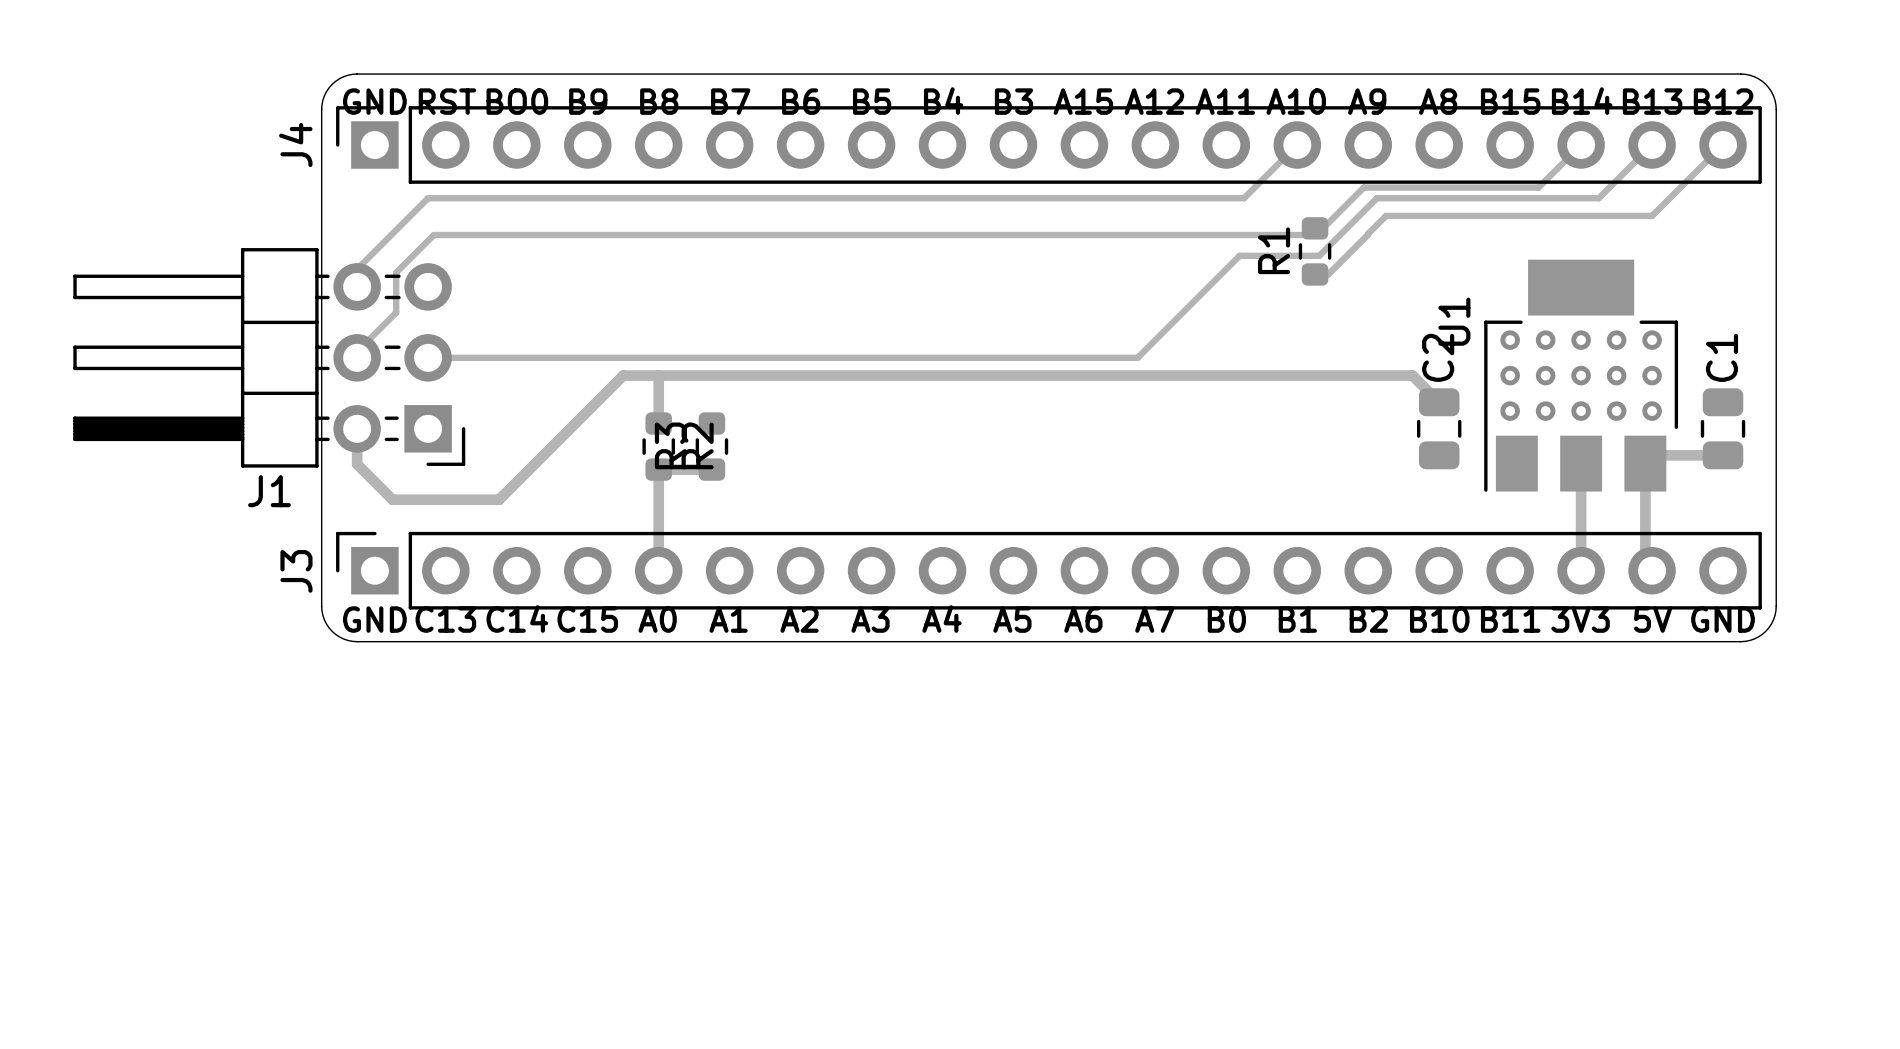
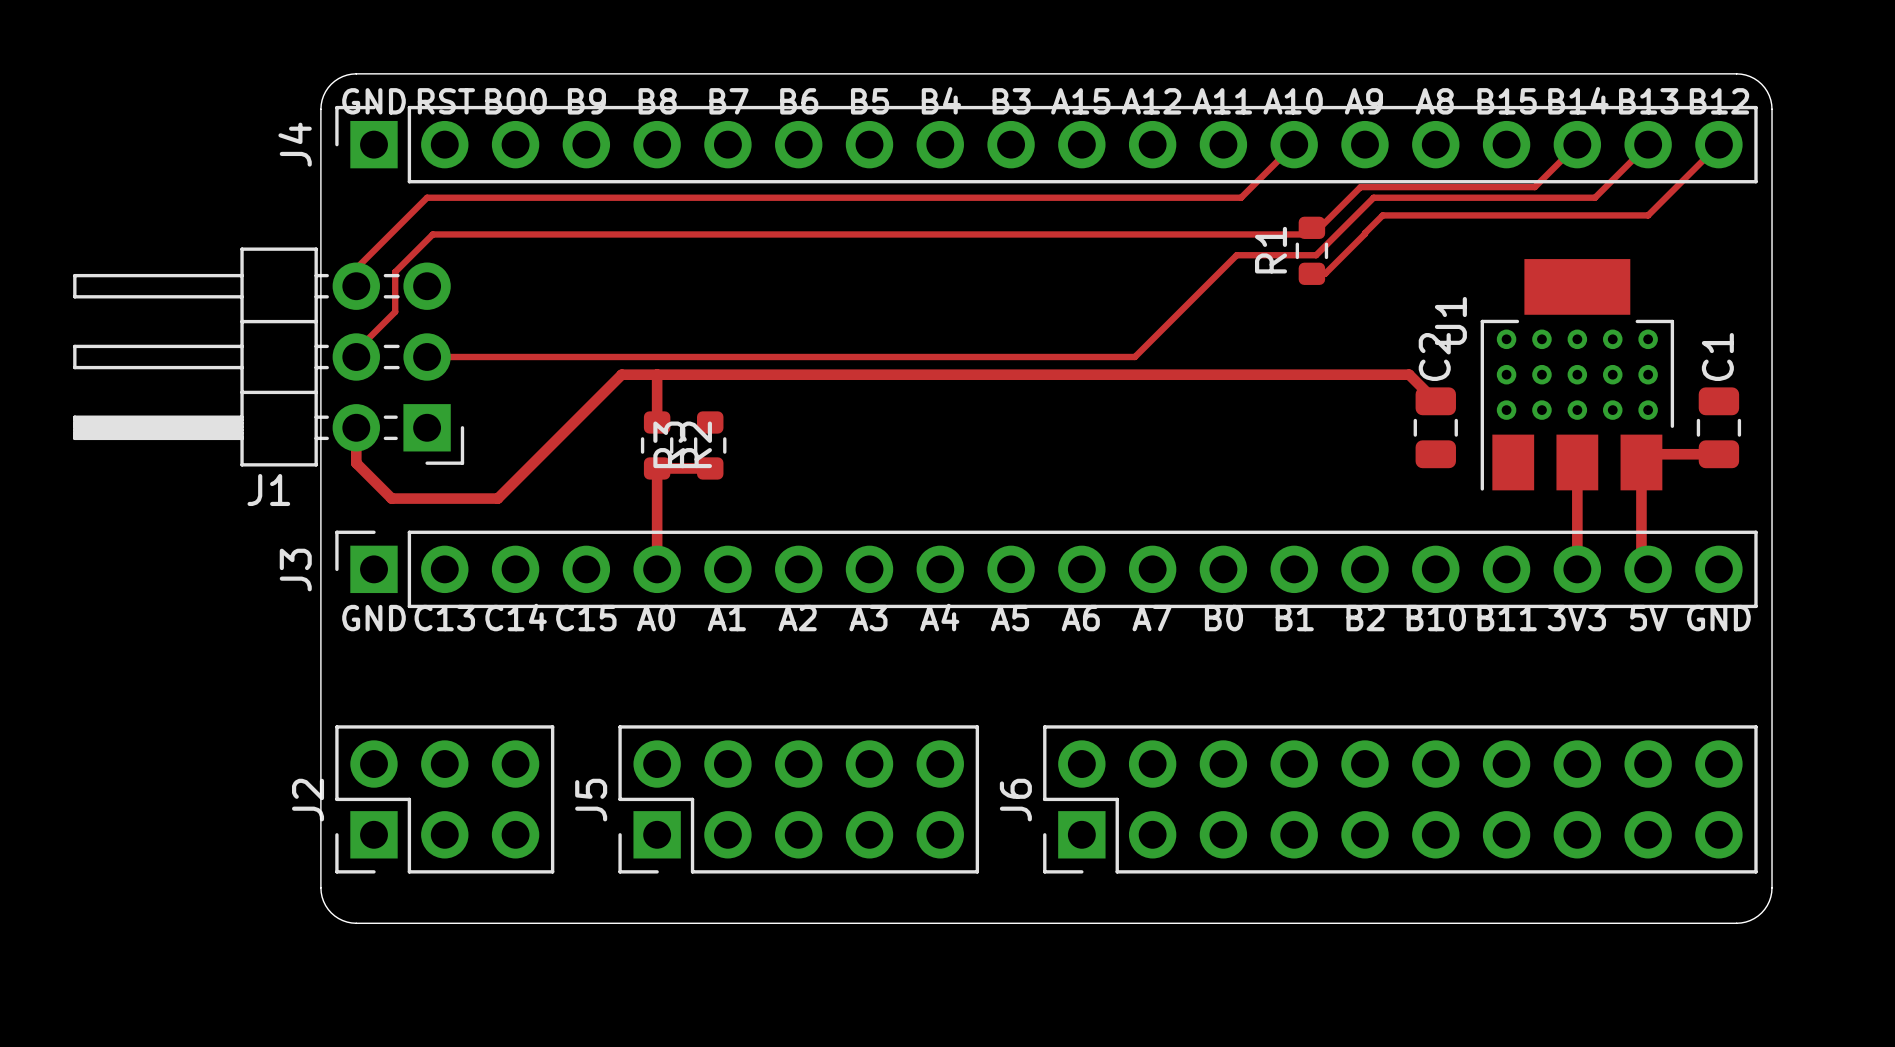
board edge: (321, 606) (324, 619) (332, 631) (343, 638) (357, 641) (1740, 641) (1754, 638) (1765, 631) (1773, 619) (1776, 606) -> (320, 604) (321, 892) (323, 901) (331, 912) (338, 918) (351, 922) (1736, 923) (1750, 920) (1761, 912) (1769, 901) (1772, 887)
board edge: none -> (1772, 604) (1772, 887)
J2: none -> (444, 799)
J5: none -> (798, 799)
J6: none -> (1400, 799)

